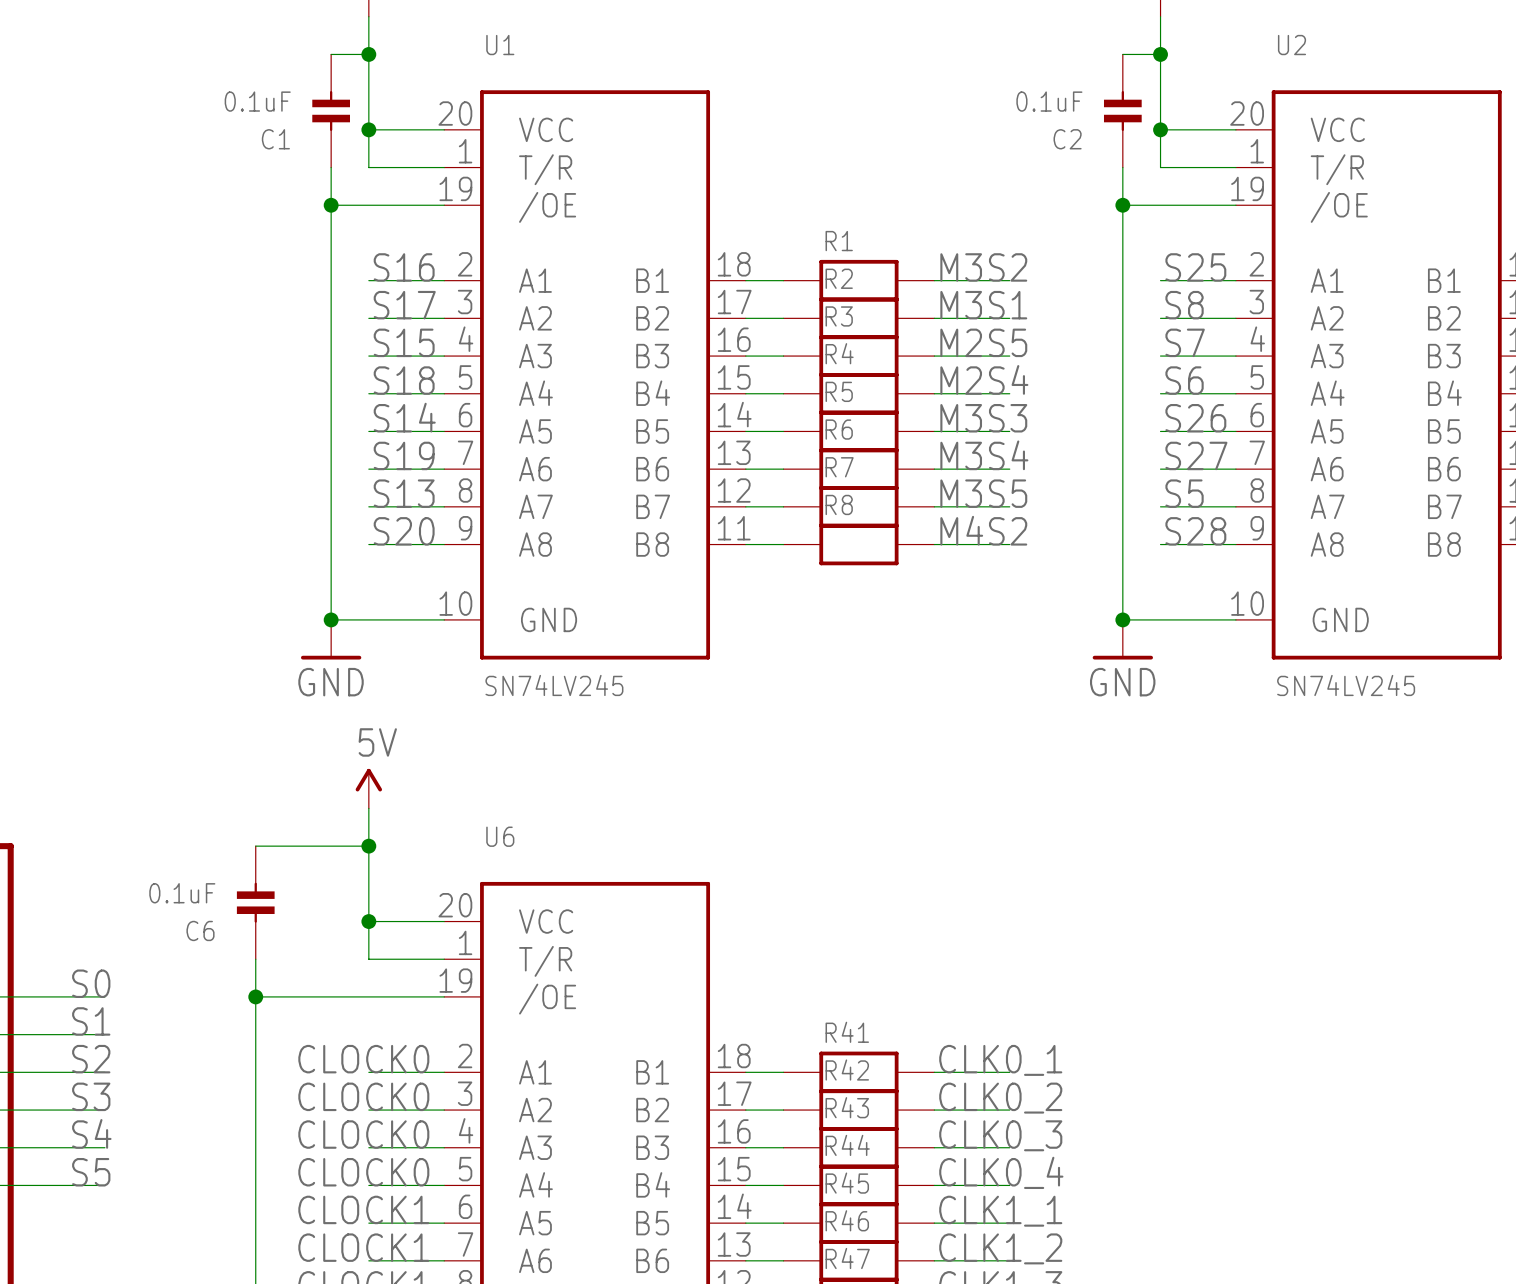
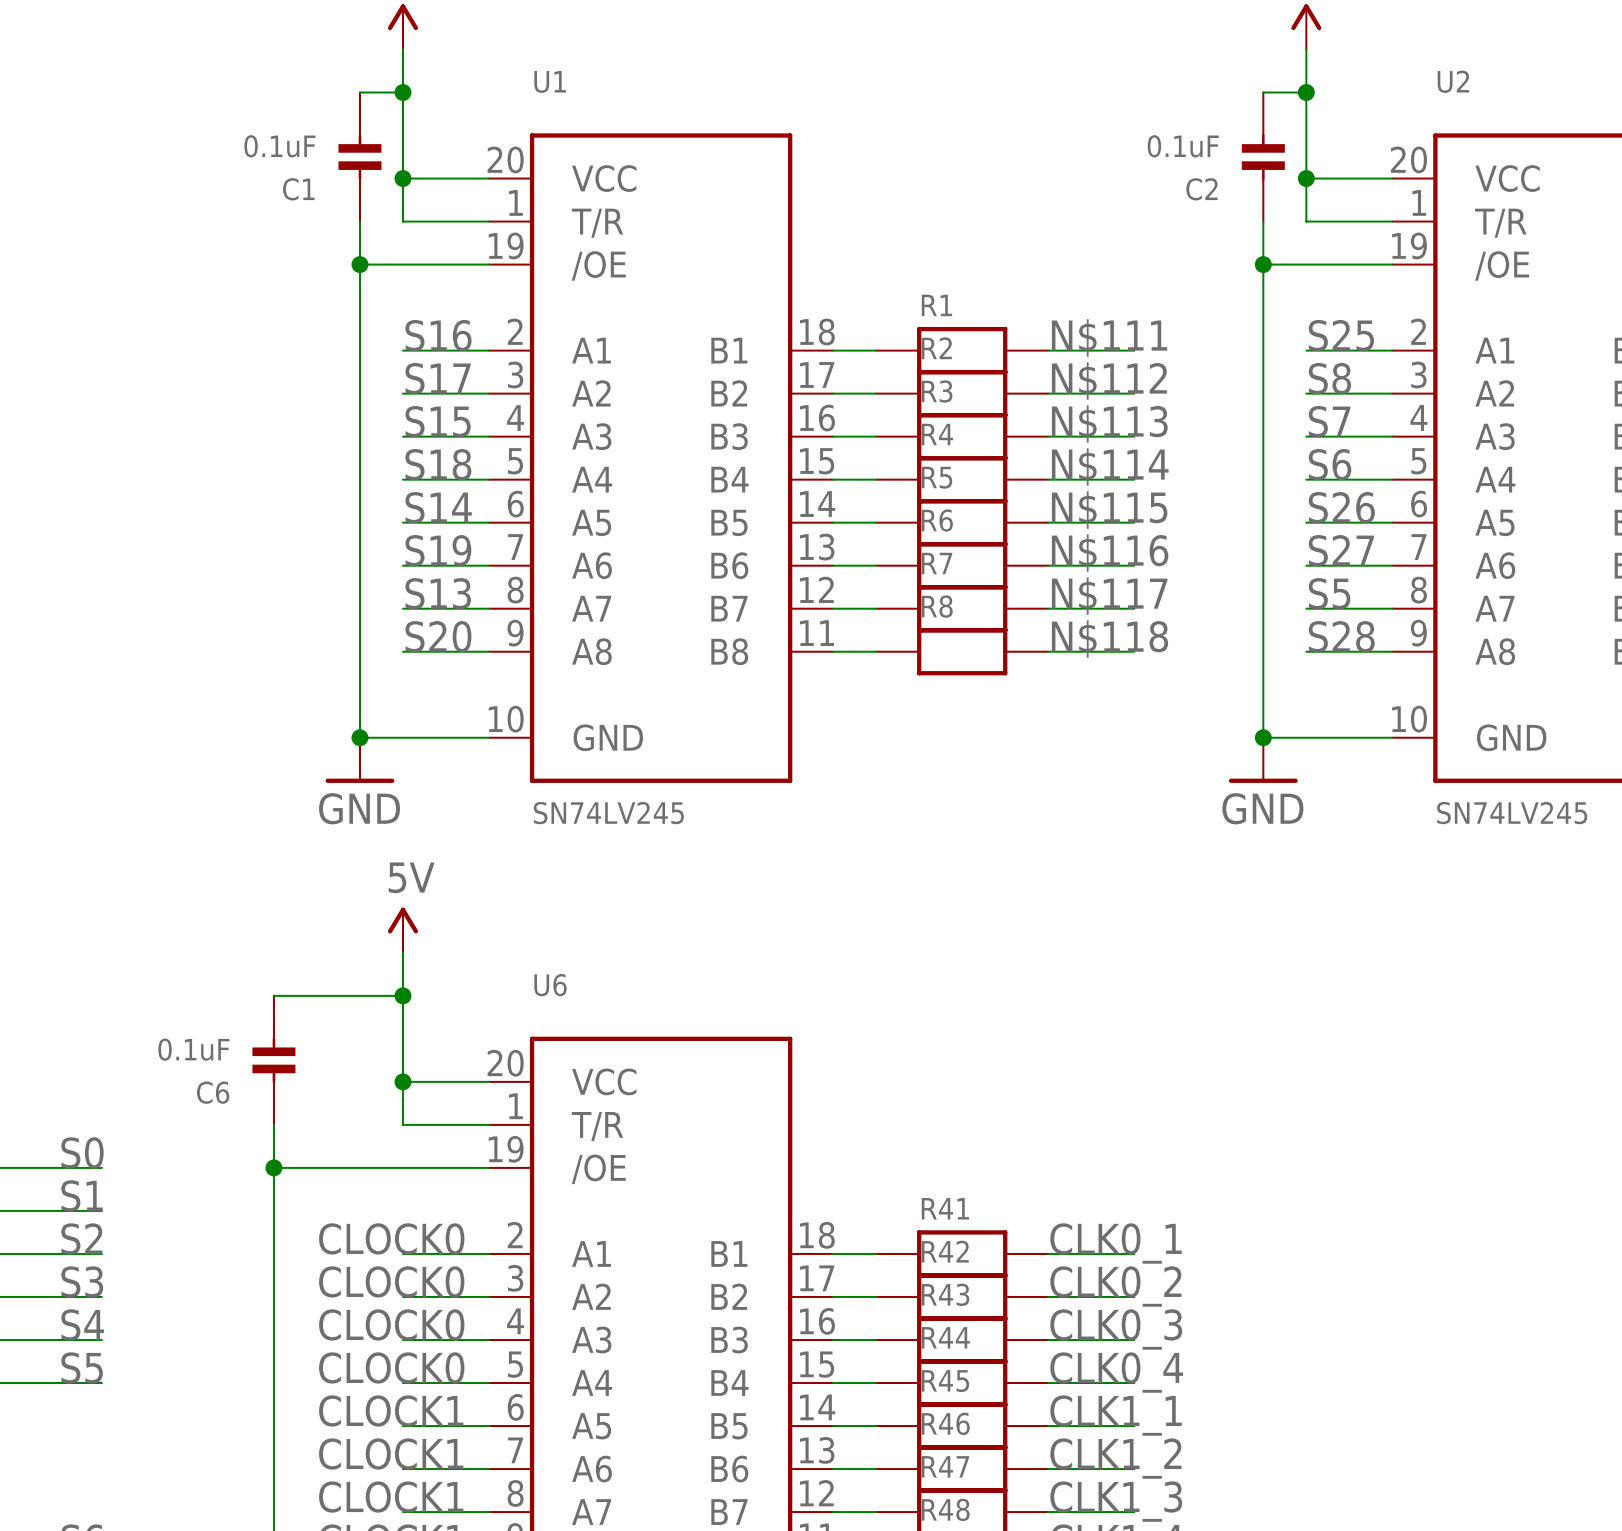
label: M3S2 (983, 267) -> N$111 (1109, 337)
label: M3S1 (983, 305) -> N$112 (1109, 380)
label: M2S5 (983, 342) -> N$113 (1109, 423)
label: M2S4 (984, 379) -> N$114 (1110, 467)
label: M3S3 (983, 418) -> N$115 (1109, 510)
label: M3S4 (984, 455) -> N$116 (1110, 553)
label: M3S5 (983, 493) -> N$117 (1109, 596)
label: M4S2 (983, 530) -> N$118 (1110, 639)

